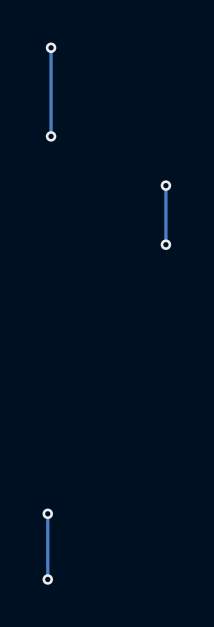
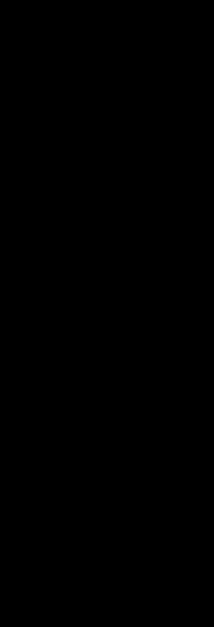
track: (51, 47) (51, 136) -> none
via: (51, 47) -> none
via: (51, 136) -> none
track: (165, 185) (165, 244) -> none
via: (165, 185) -> none
via: (165, 244) -> none
track: (47, 513) (47, 579) -> none
via: (47, 513) -> none
via: (47, 579) -> none

